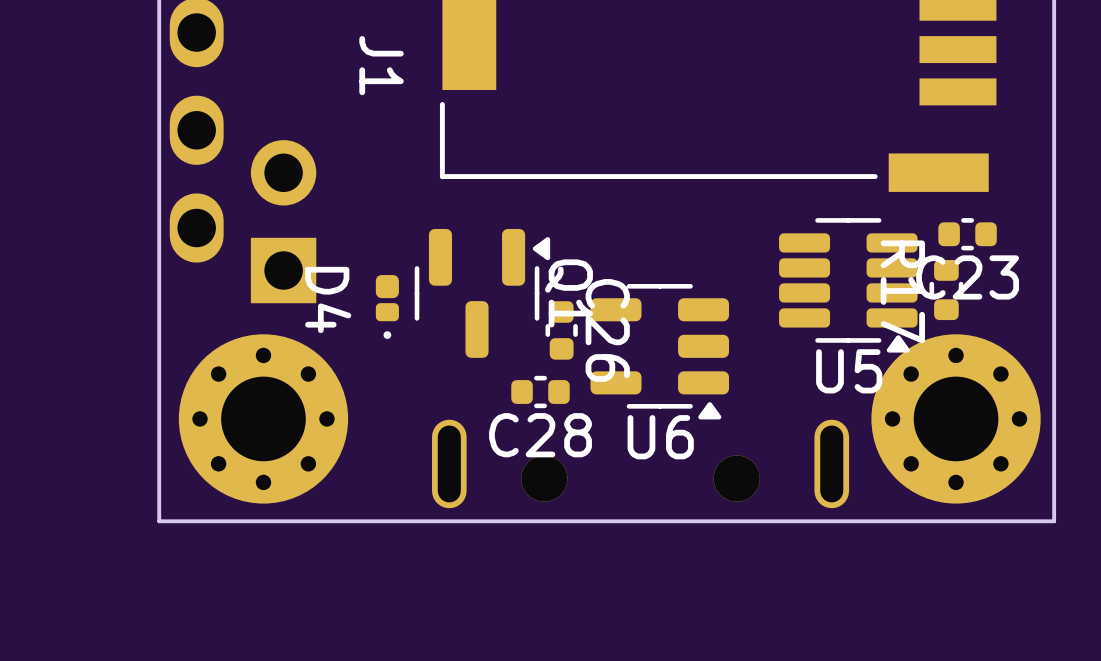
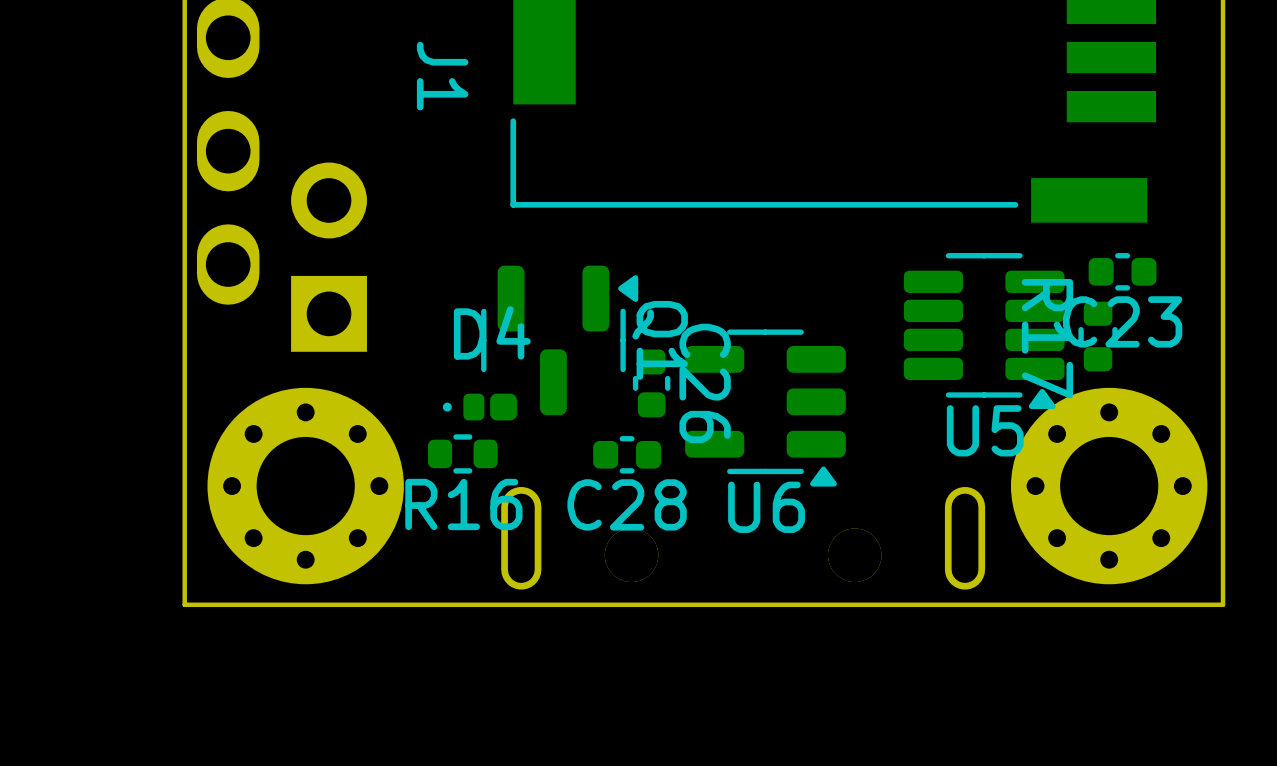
D4 rotation: 0° (387, 306) -> 90° clockwise (479, 407)
D4 position: (387, 306) -> (479, 407)
R16: none -> (462, 453)

